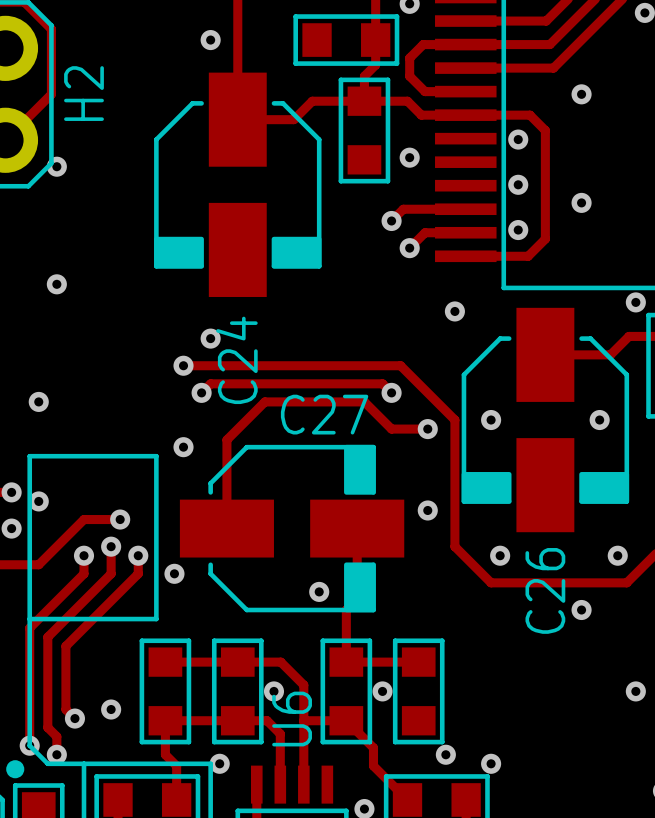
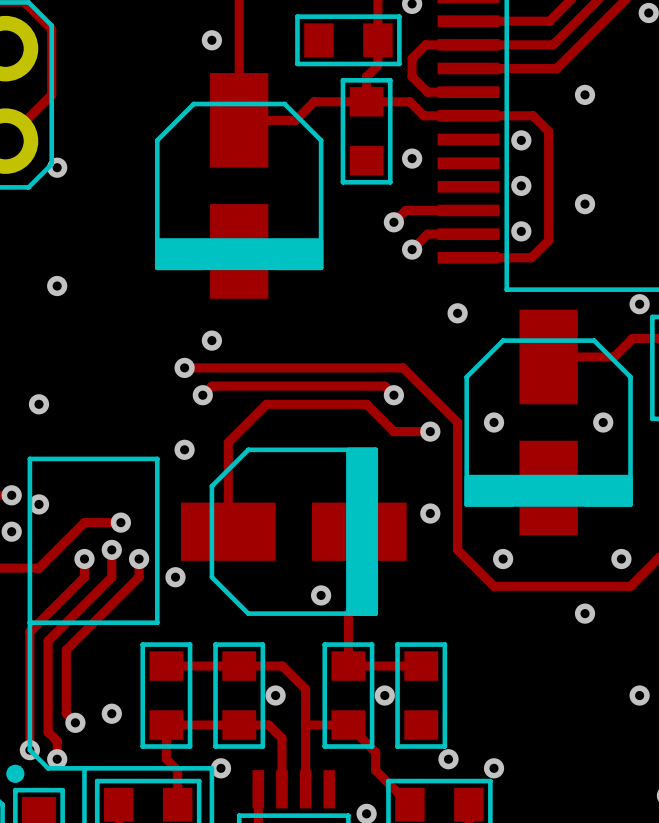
H2 name: H2 (83, 93) -> none
C24: (237, 184) -> none
part: none -> (239, 185)
C26: (545, 420) -> none
part: none -> (548, 422)
C27: (292, 528) -> none
part: none -> (293, 531)
U6 name: U6 (292, 719) -> none

